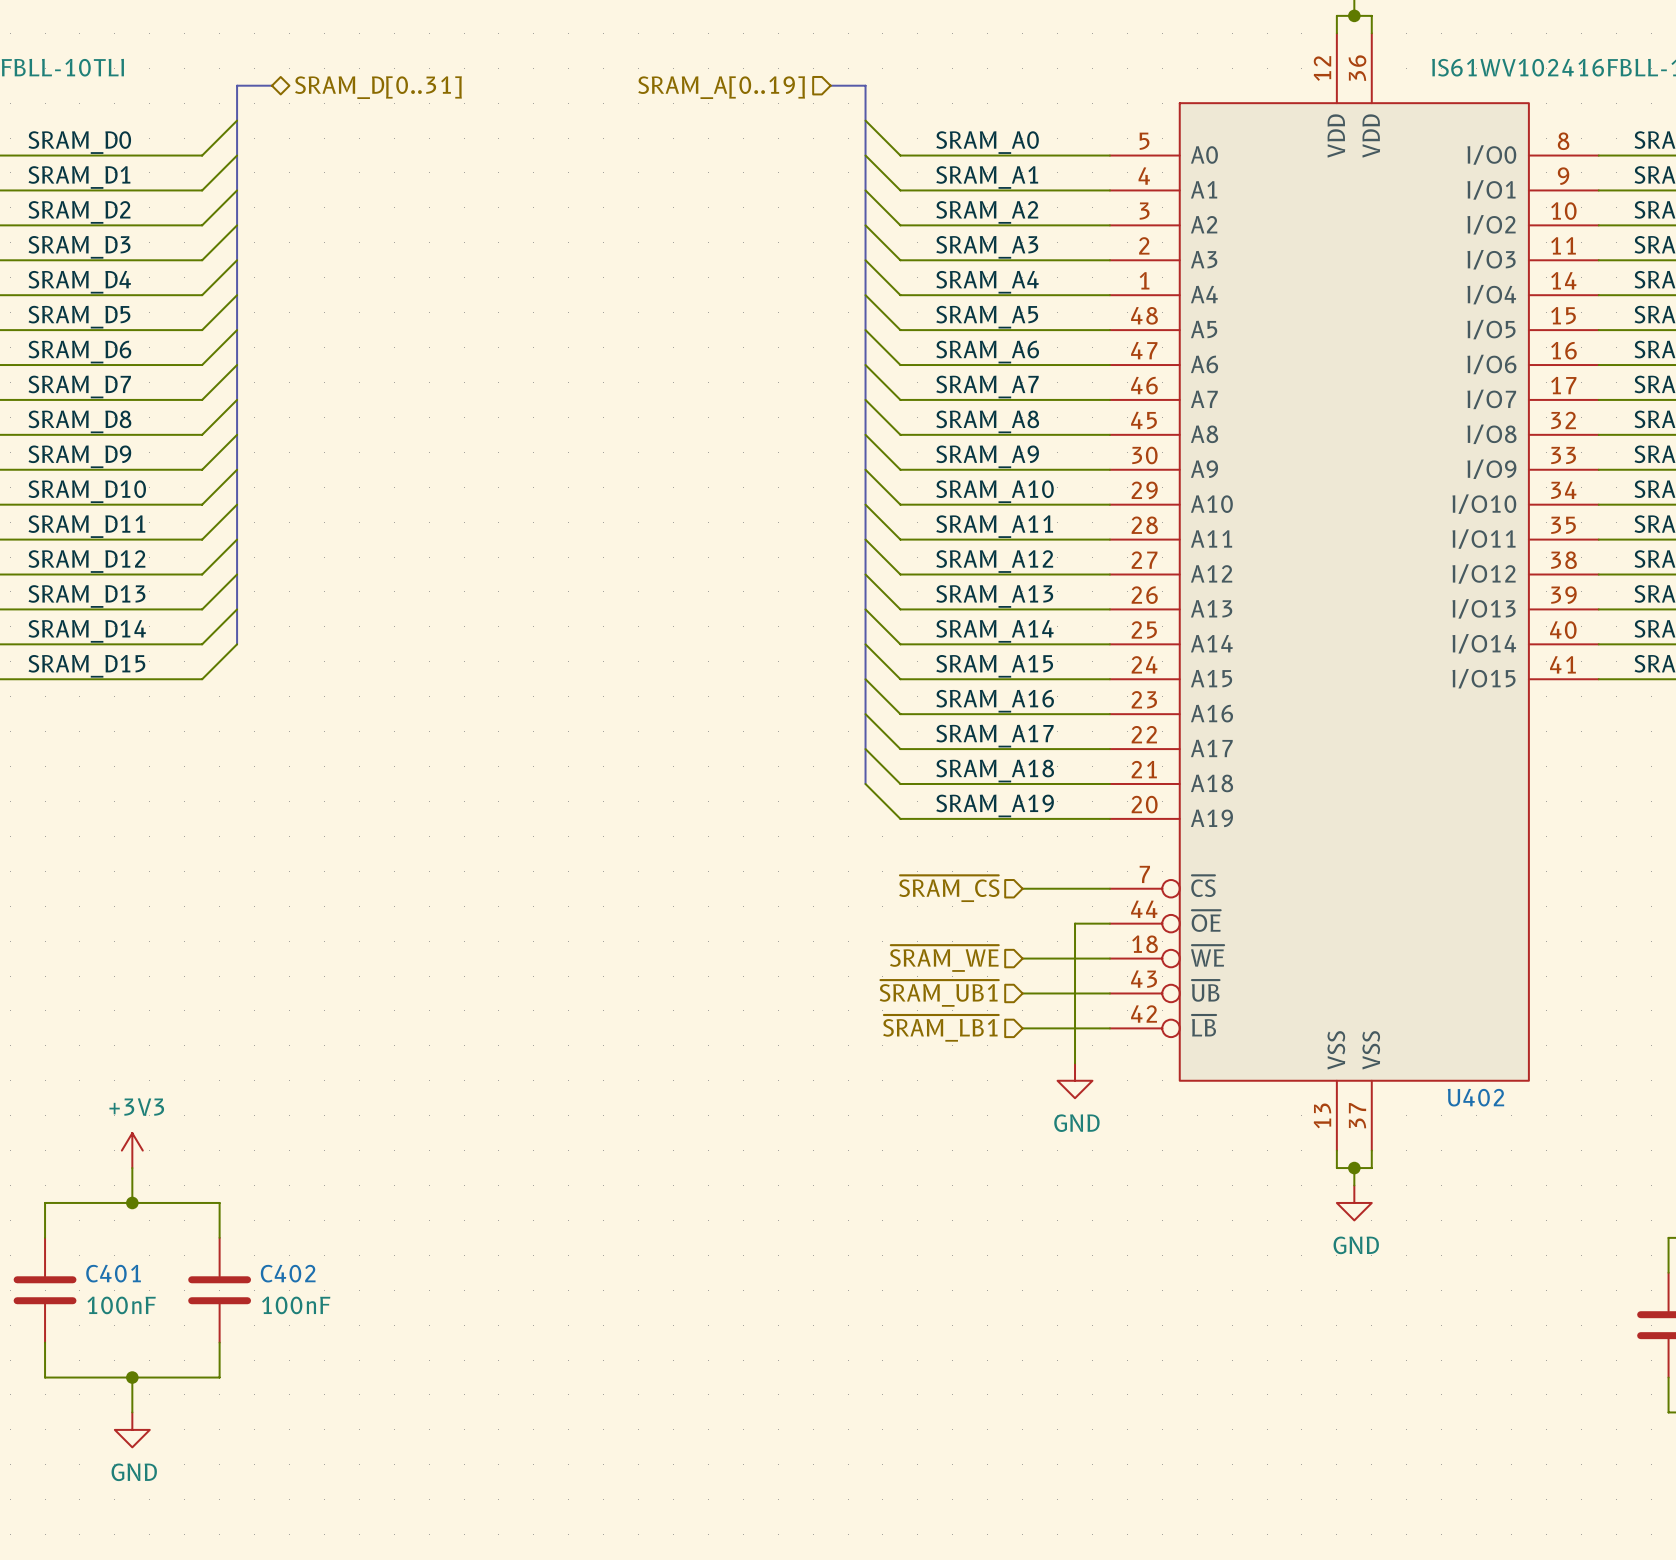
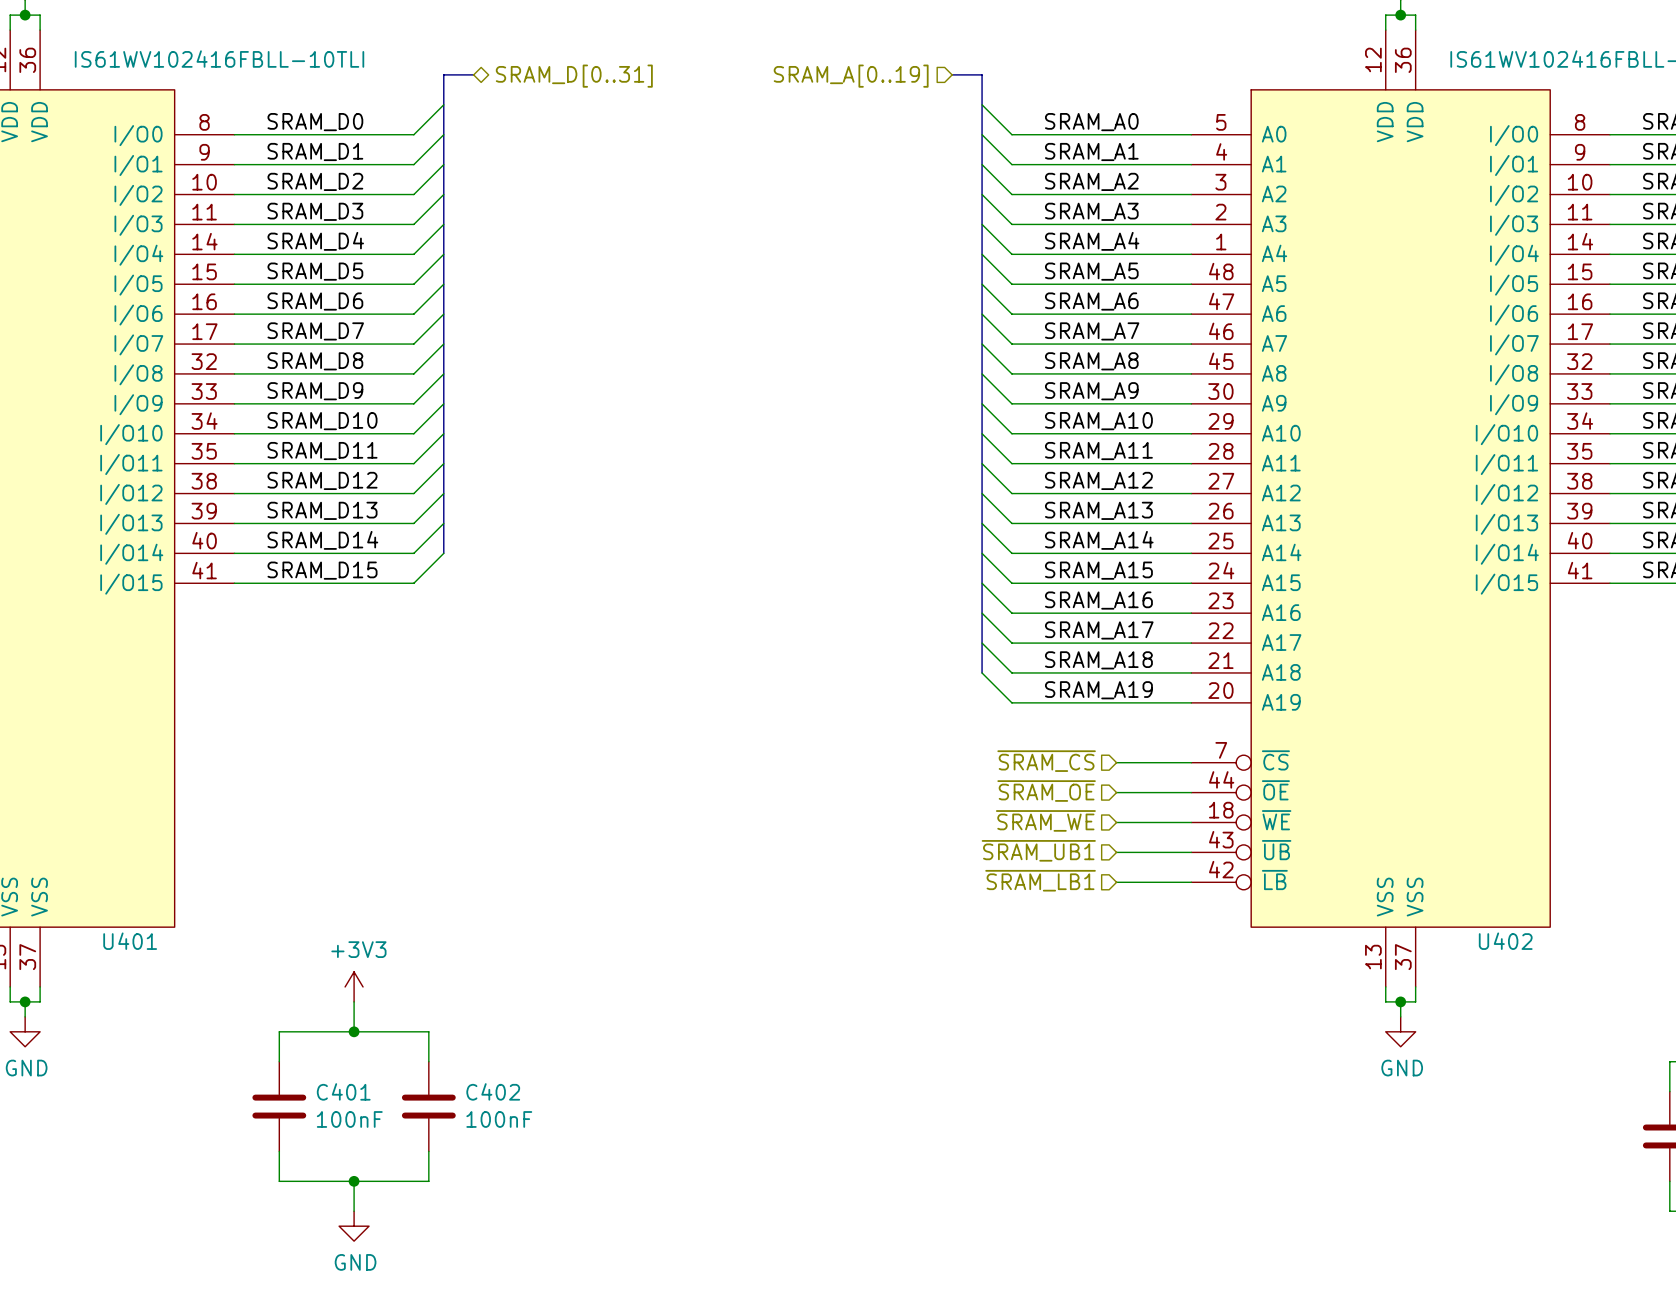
hierarchical label: none -> ~{SRAM_OE} (1046, 791)
wire: (1075, 923) (1075, 1063) -> (1161, 792) (1116, 792)
power symbol: GND (1075, 1080) -> none

